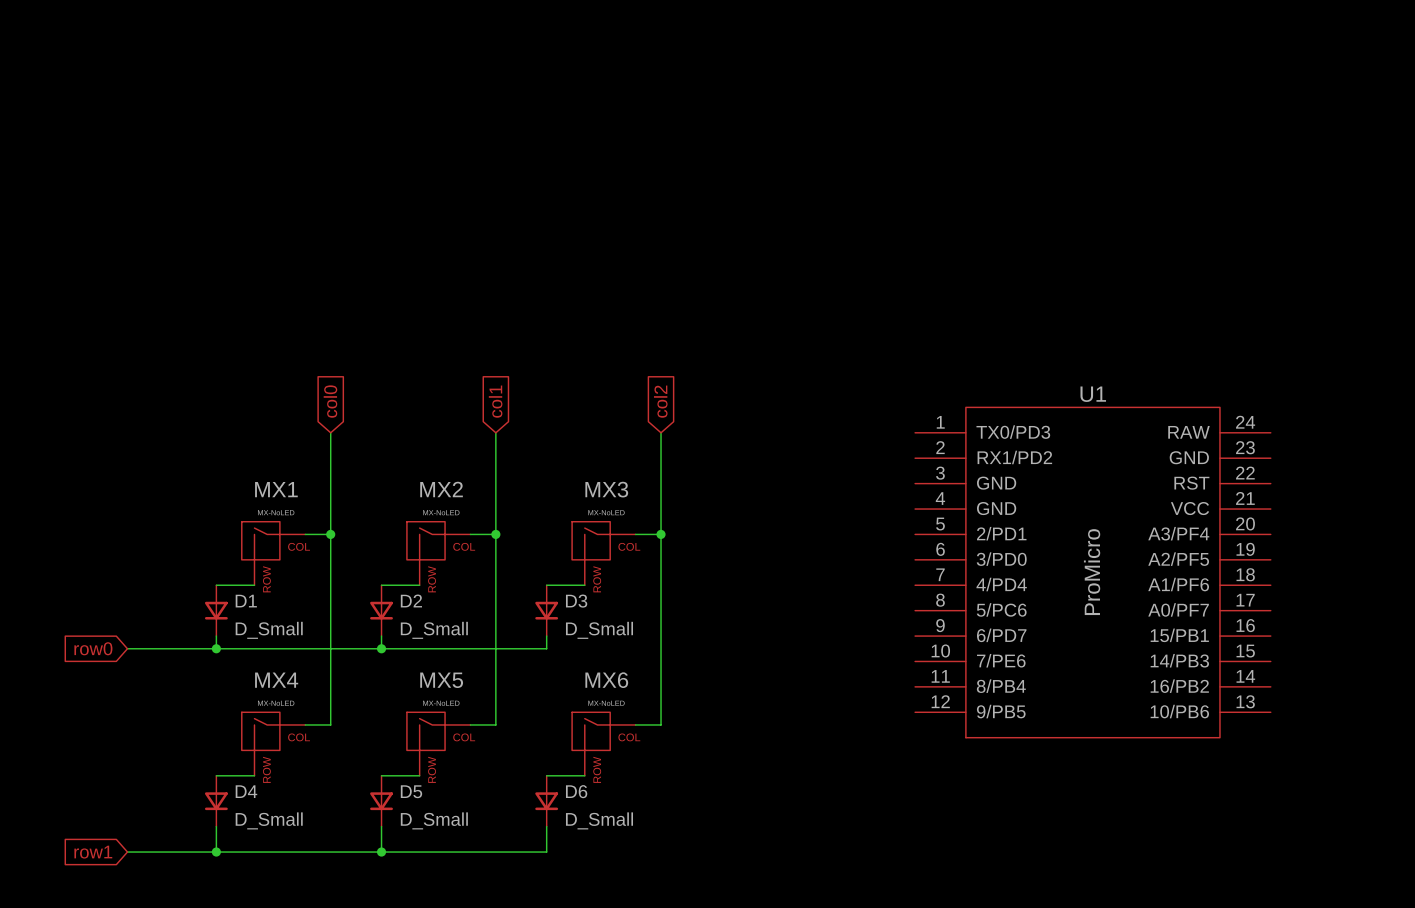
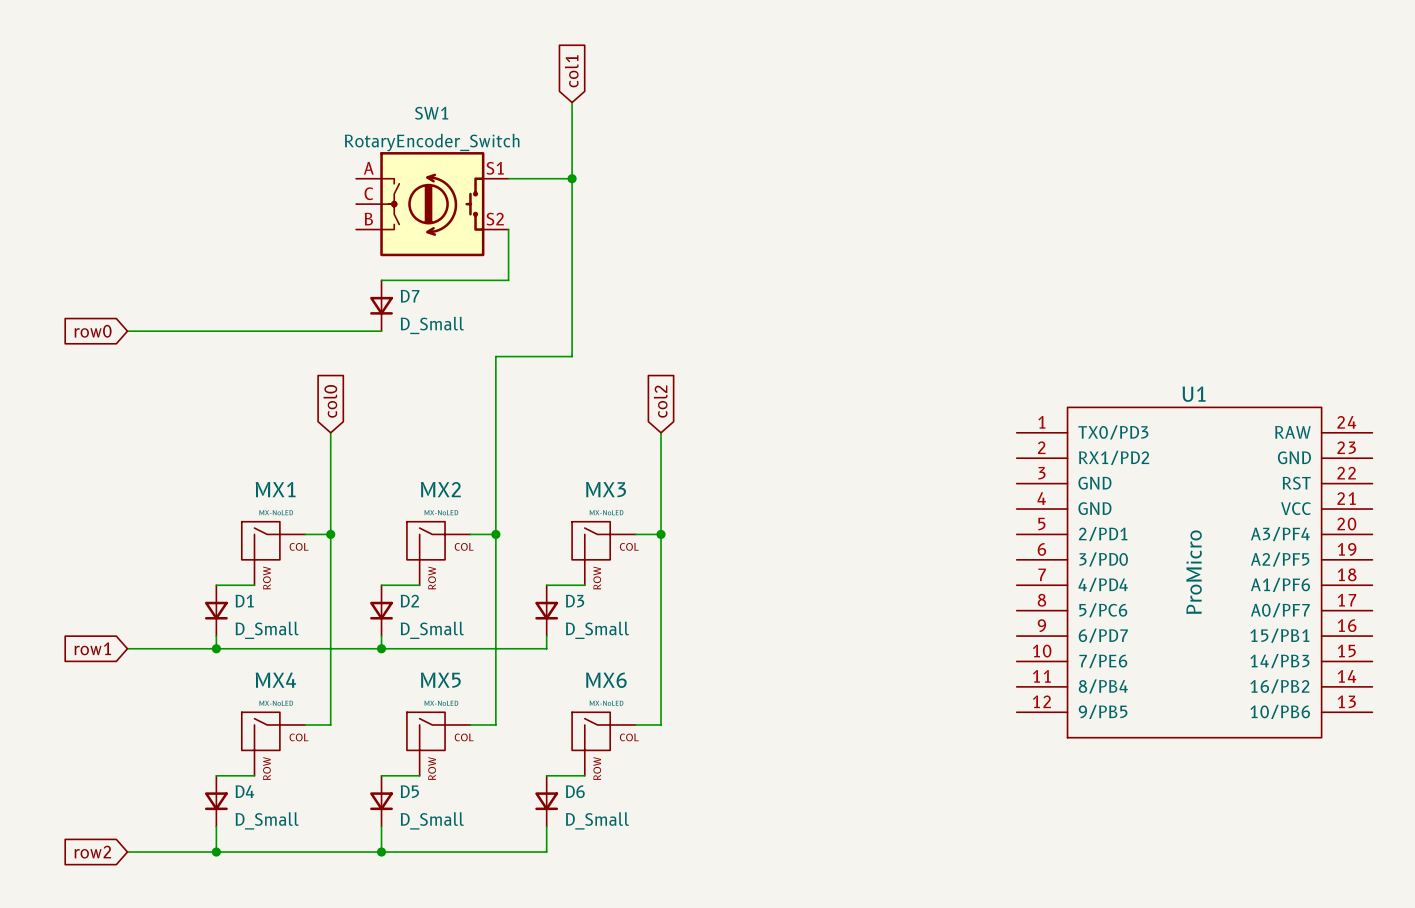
global label: none -> col1 (571, 71)
wire: none -> (572, 102) (572, 356) (495, 356) (495, 432)
wire: none -> (508, 178) (572, 178)
junction: none -> (572, 178)
SW1: none -> RotaryEncoder_Switch (432, 204)
wire: none -> (508, 229) (508, 280) (381, 280)
D7: none -> D_Small (381, 305)
global label: none -> row0 (93, 331)
wire: none -> (127, 331) (381, 331)
global label: col1 (495, 401) -> none
U1 position: (1092, 572) -> (1194, 572)
global label: row0 (93, 648) -> row1 (92, 648)
global label: row1 (93, 852) -> row2 (92, 852)

